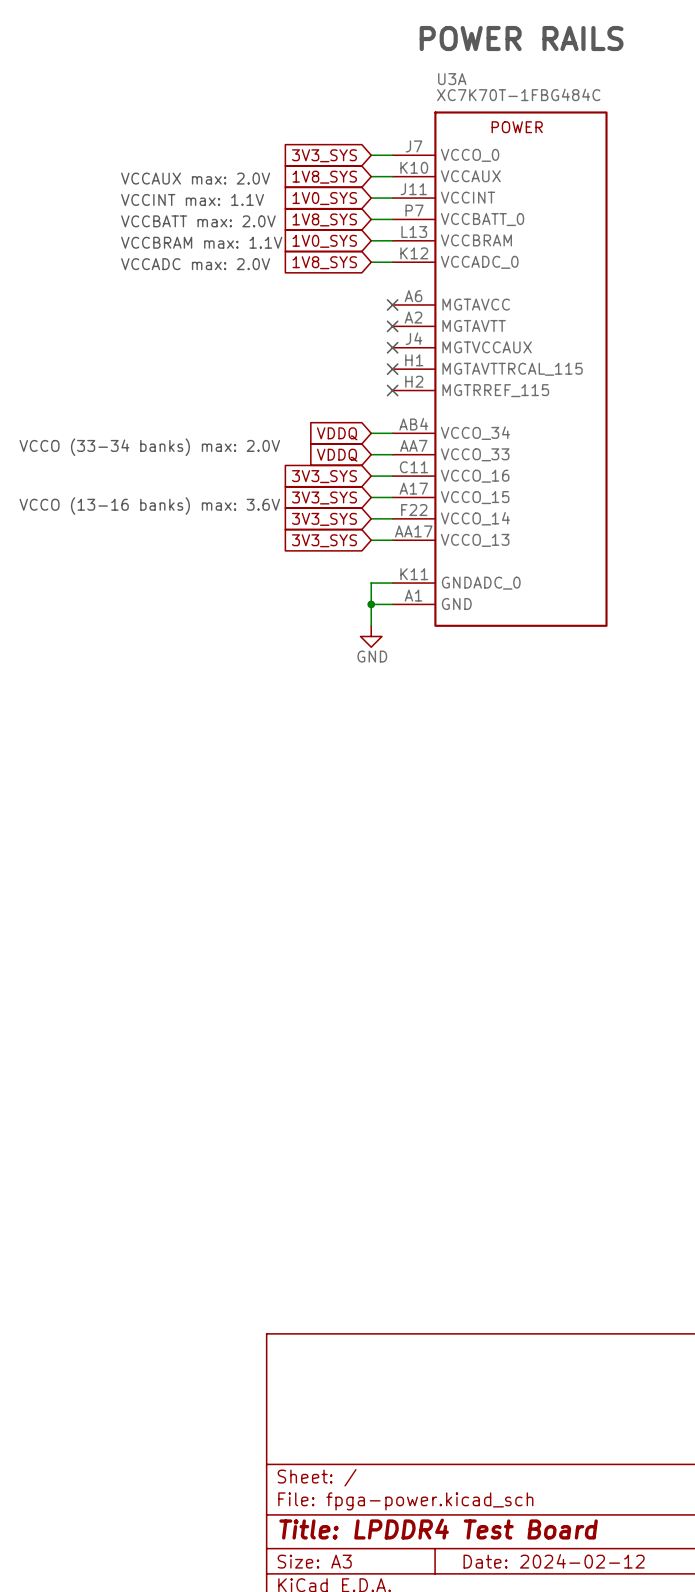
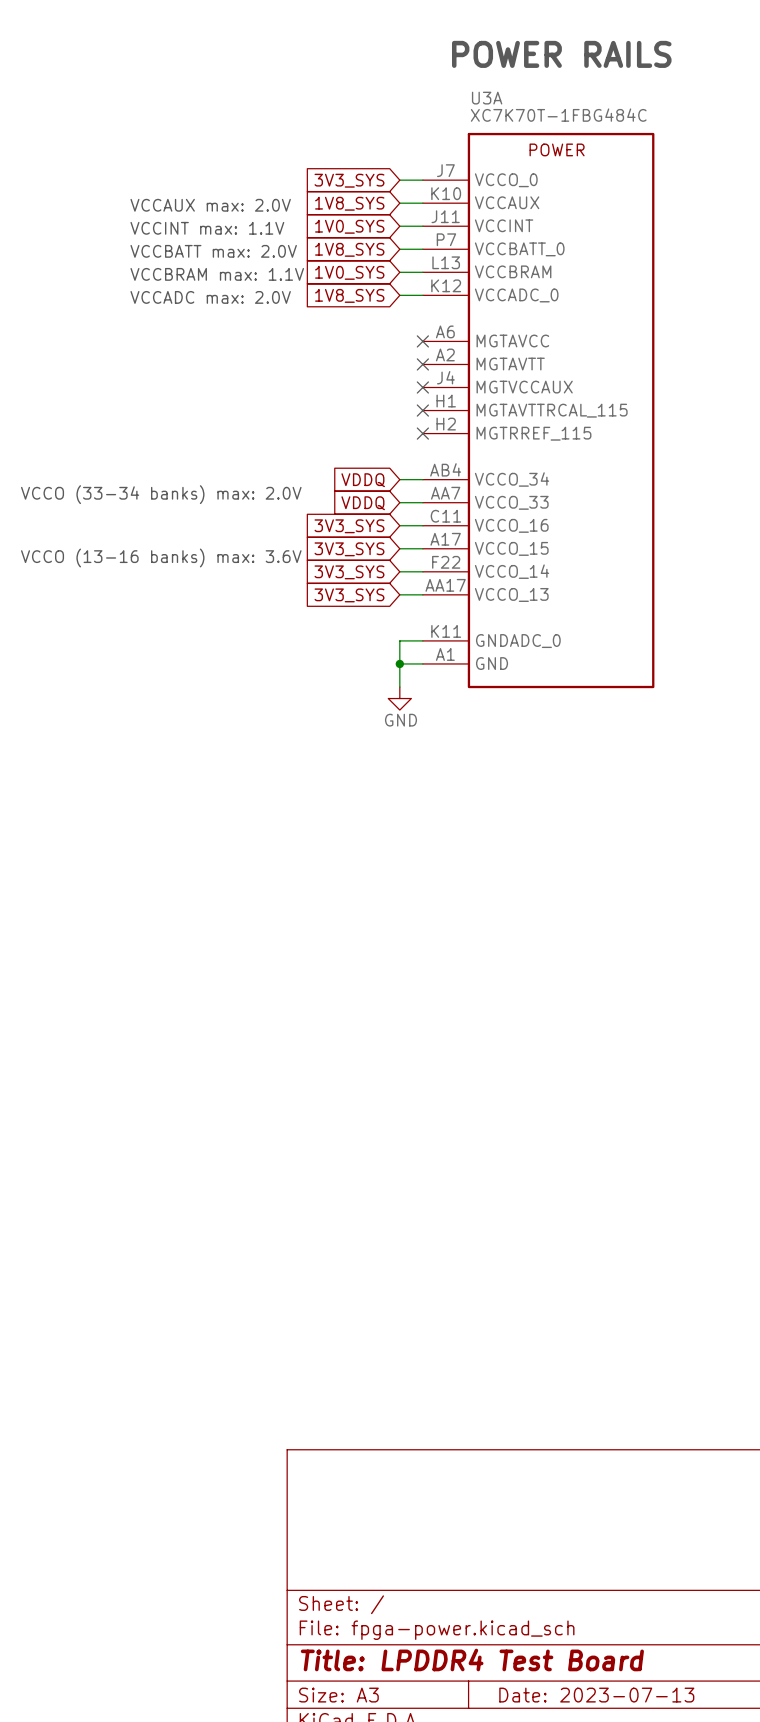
title block: Date: 2024-02-12 (554, 1561) -> Date: 2023-07-13 (596, 1695)

